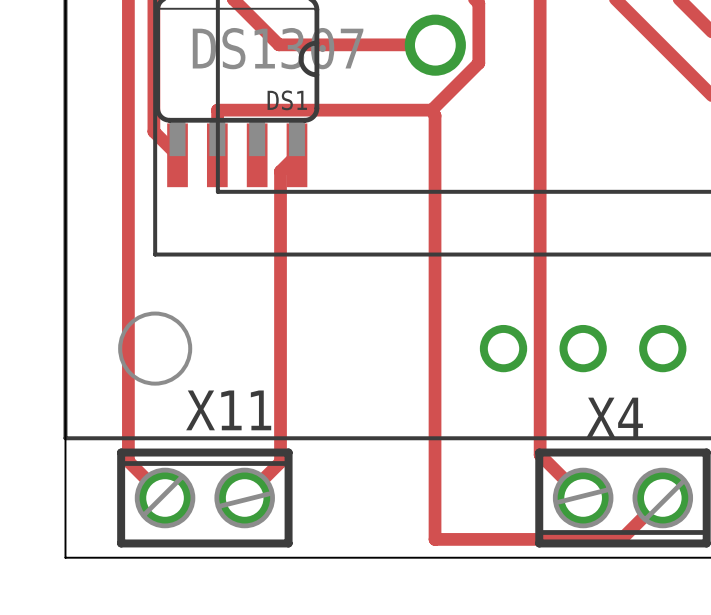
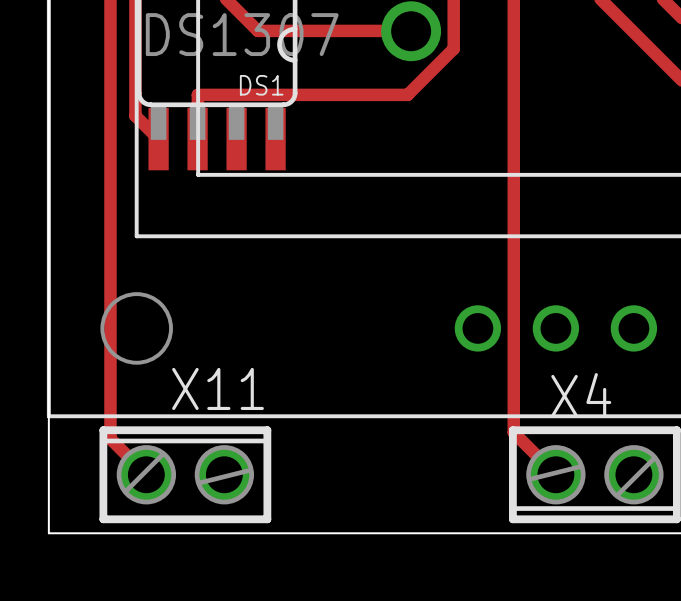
track: (431, 110) (435, 115) (435, 539) (621, 539) (662, 497) -> none
track: (296, 155) (280, 171) (280, 462) (244, 497) -> none

